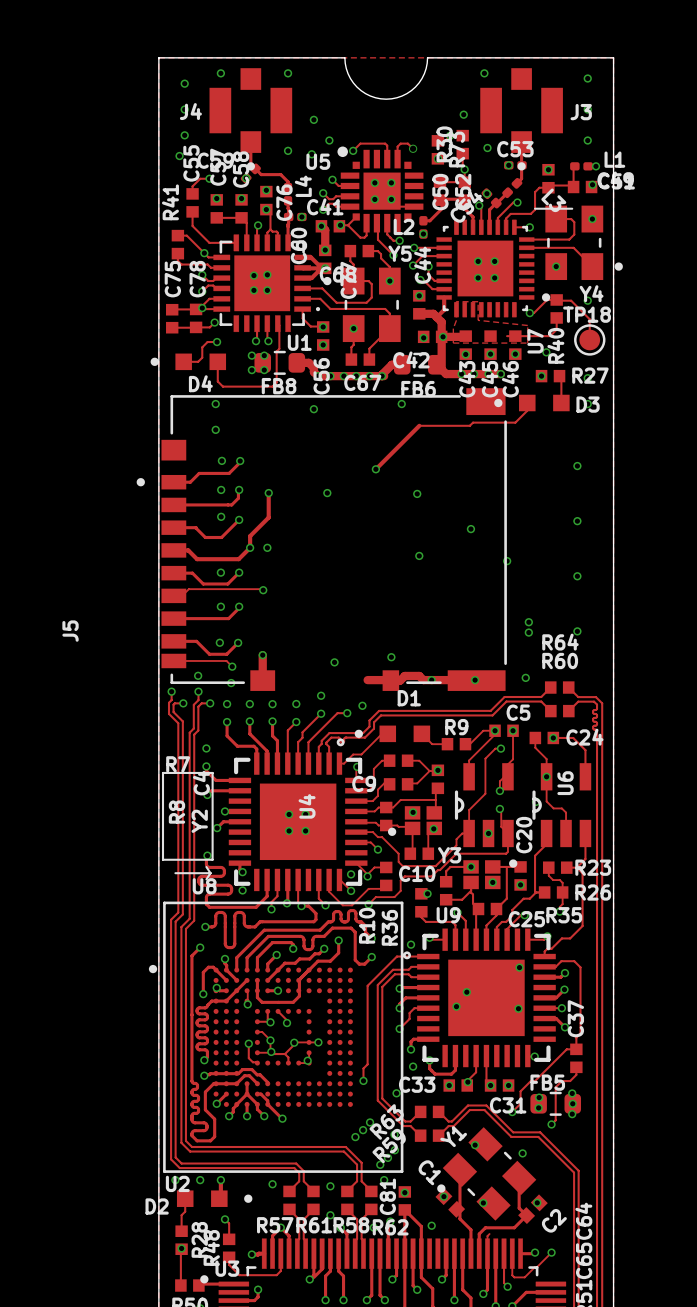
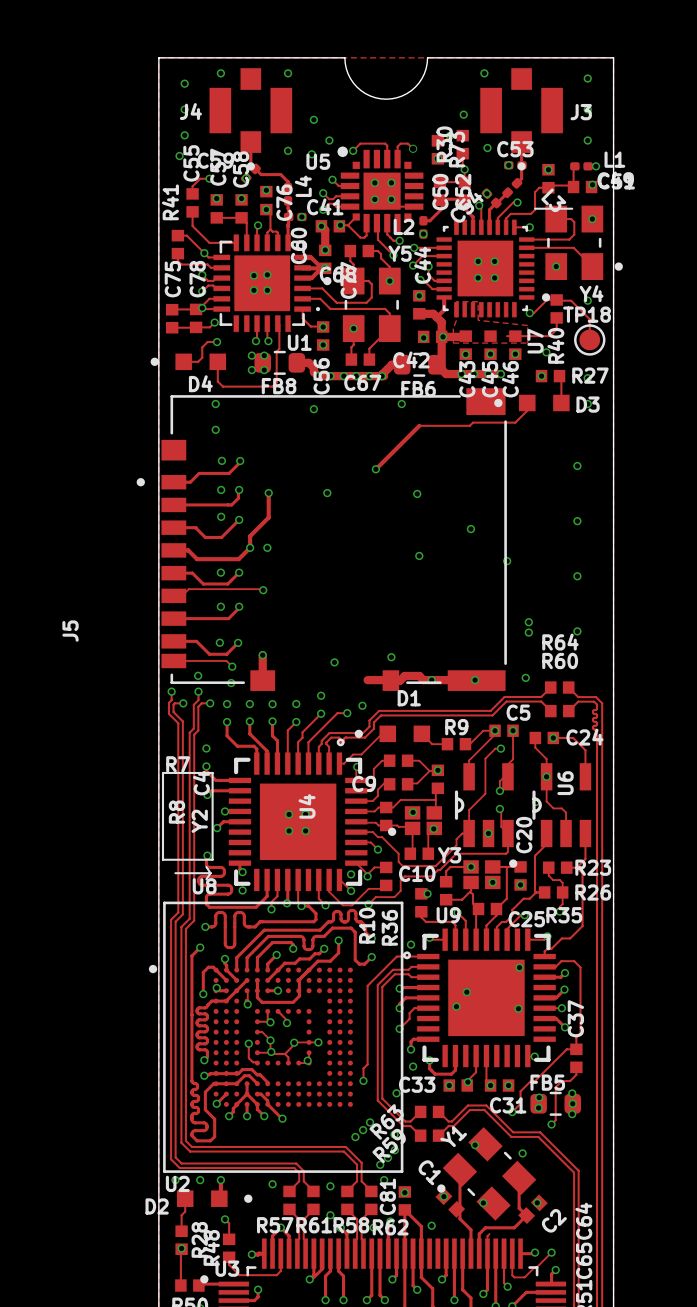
track: none -> (555, 1270) (551, 1274) (550, 1284)
via: none -> (555, 1270)

